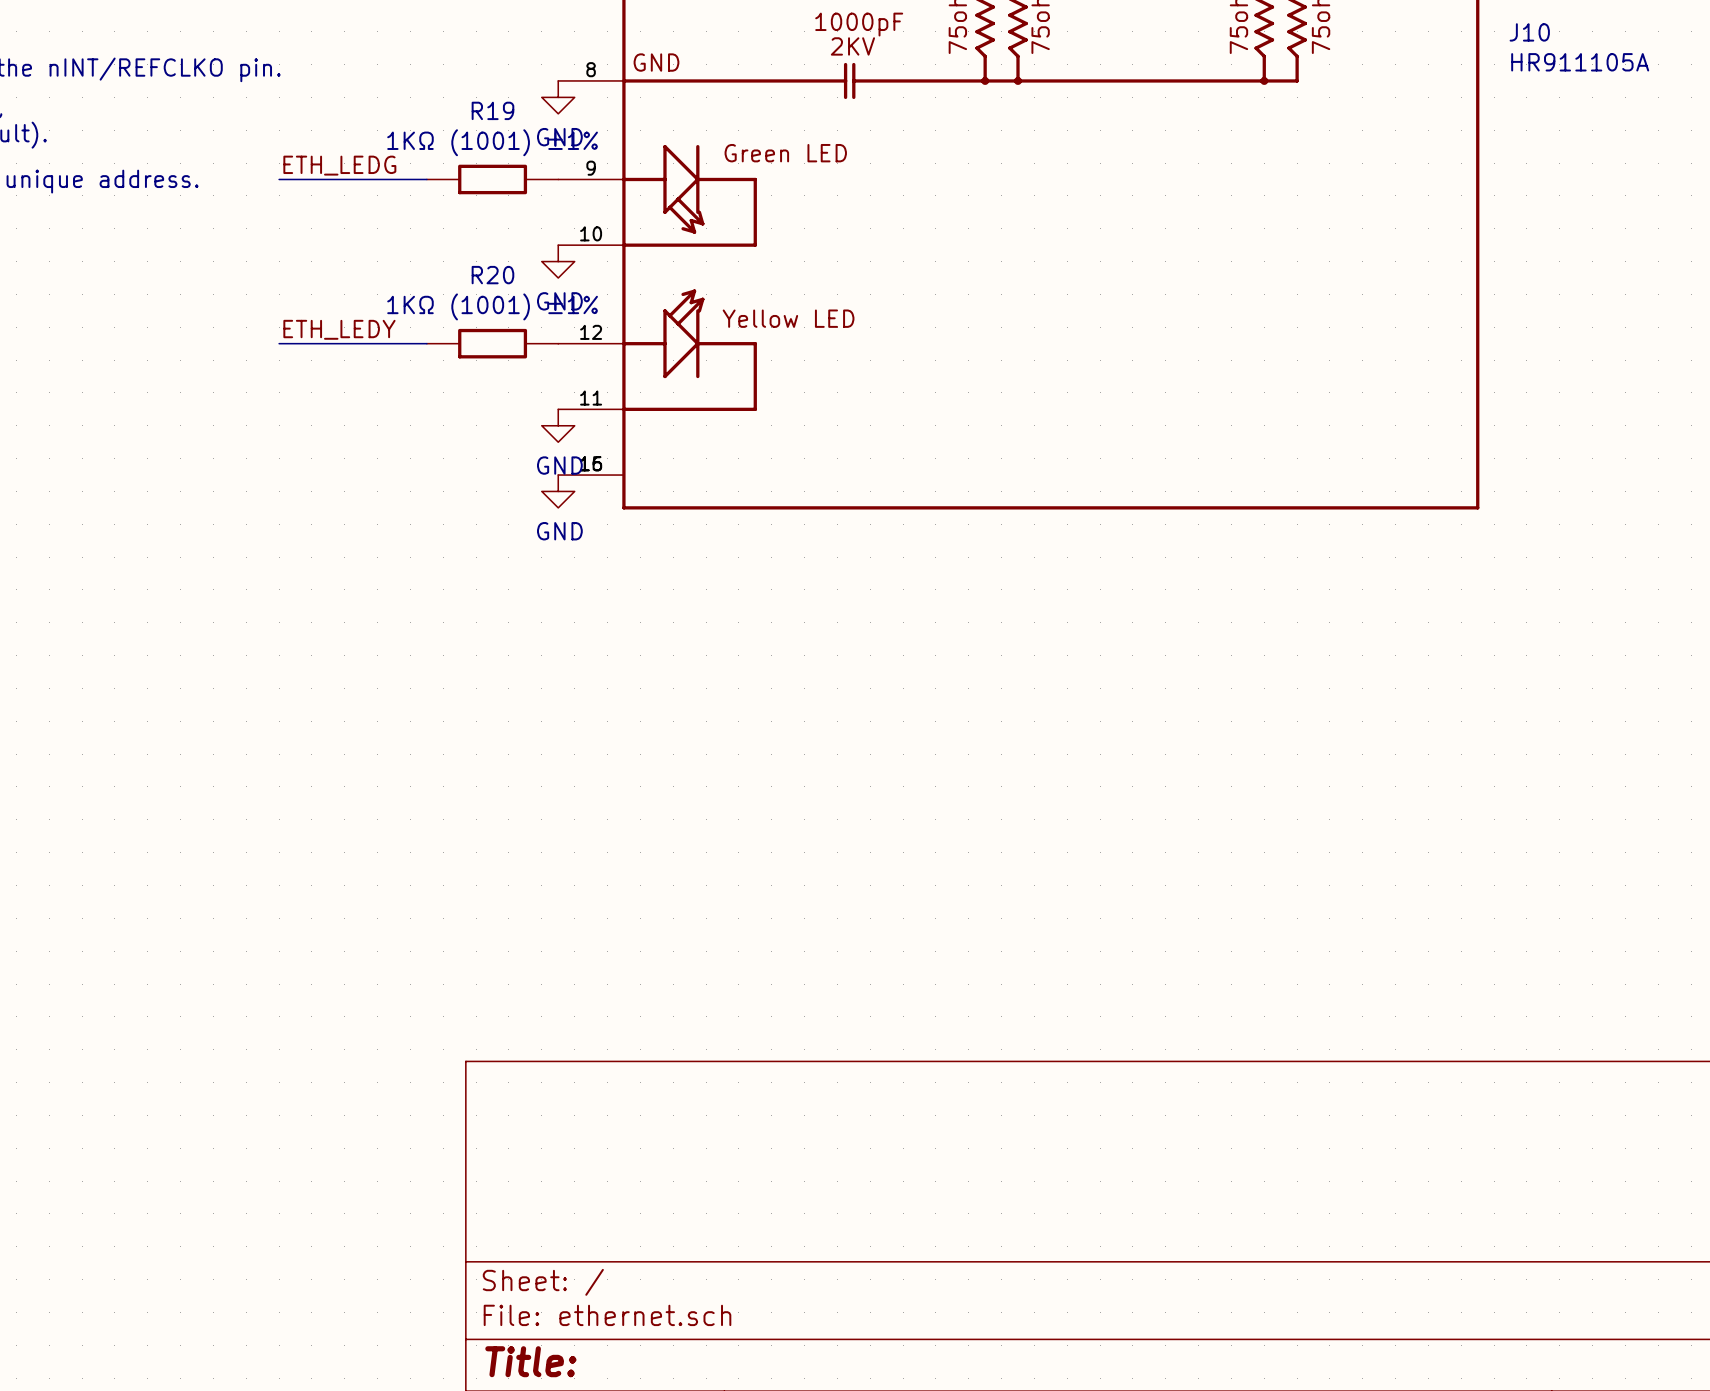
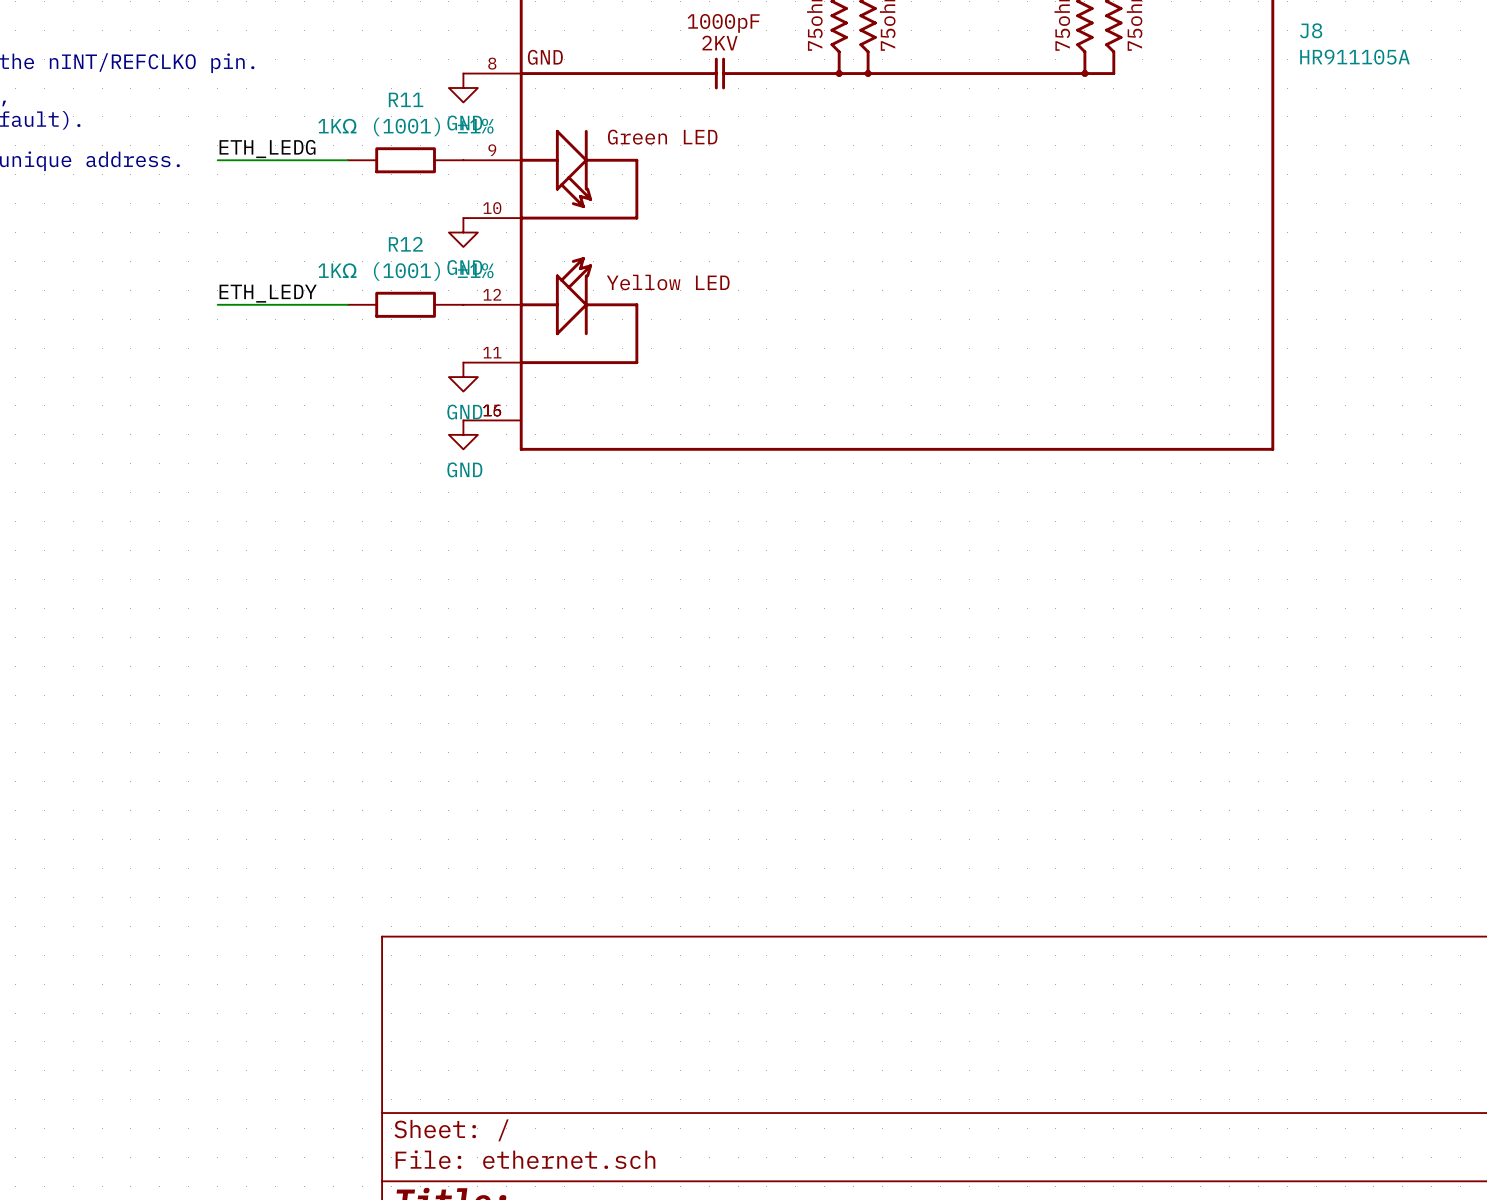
J10 name: J10 (1529, 32) -> J8 (1311, 30)
R19 name: R19 (492, 110) -> R11 (406, 99)
R20 name: R20 (492, 275) -> R12 (405, 244)

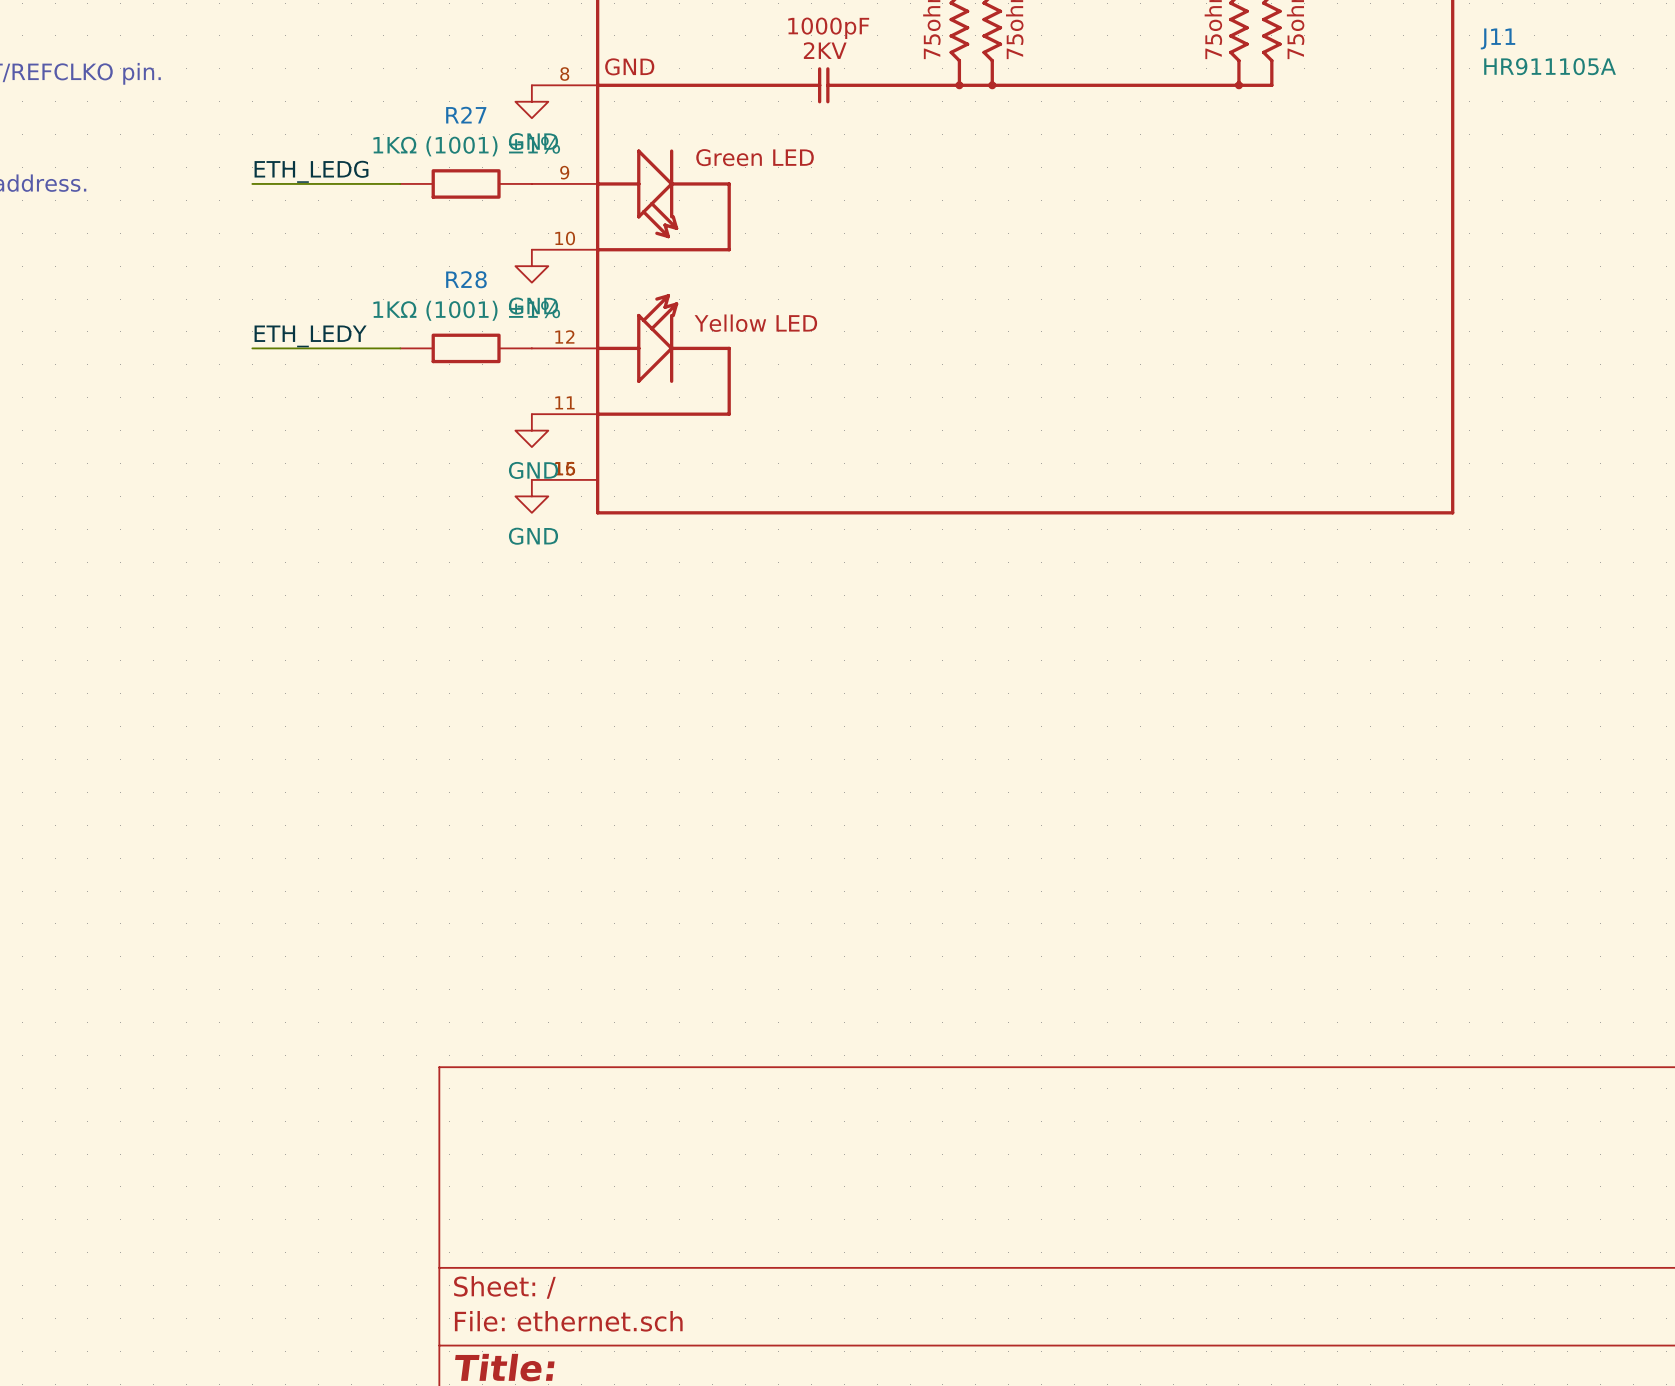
J8 name: J8 (1311, 30) -> J11 (1498, 38)
R11 name: R11 (406, 99) -> R27 (466, 115)
R12 name: R12 (405, 244) -> R28 (466, 279)

